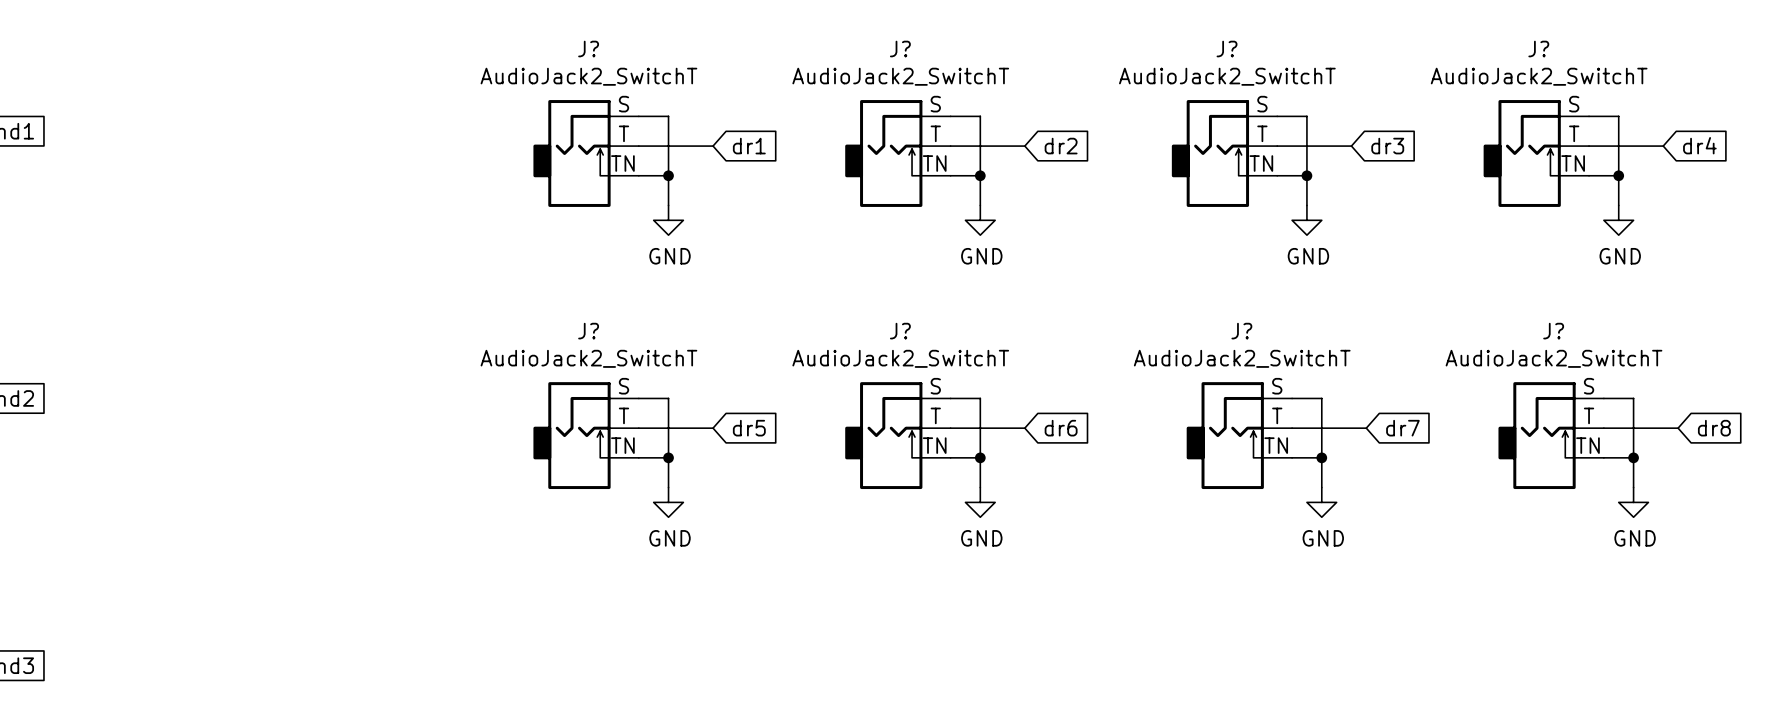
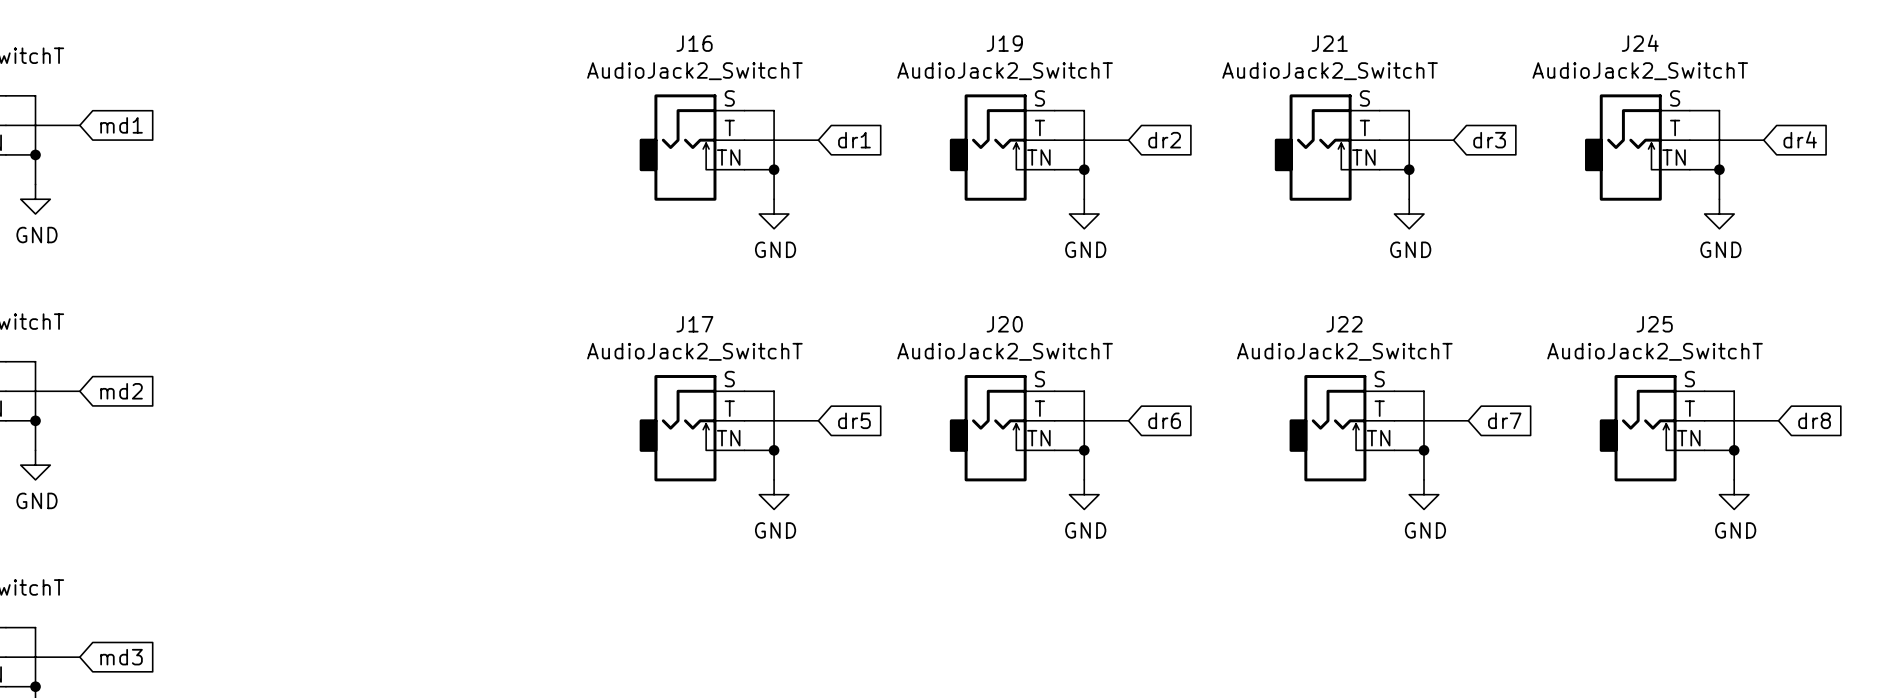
J? name: J? (588, 49) -> J16 (694, 43)
J? name: J? (900, 49) -> J19 (1004, 43)
J? name: J? (1227, 49) -> J21 (1329, 43)
J? name: J? (1538, 49) -> J24 (1640, 43)
J? name: J? (588, 331) -> J17 (694, 324)
J? name: J? (900, 331) -> J20 (1004, 324)
J? name: J? (1241, 331) -> J22 (1344, 324)
J? name: J? (1553, 331) -> J25 (1654, 324)

